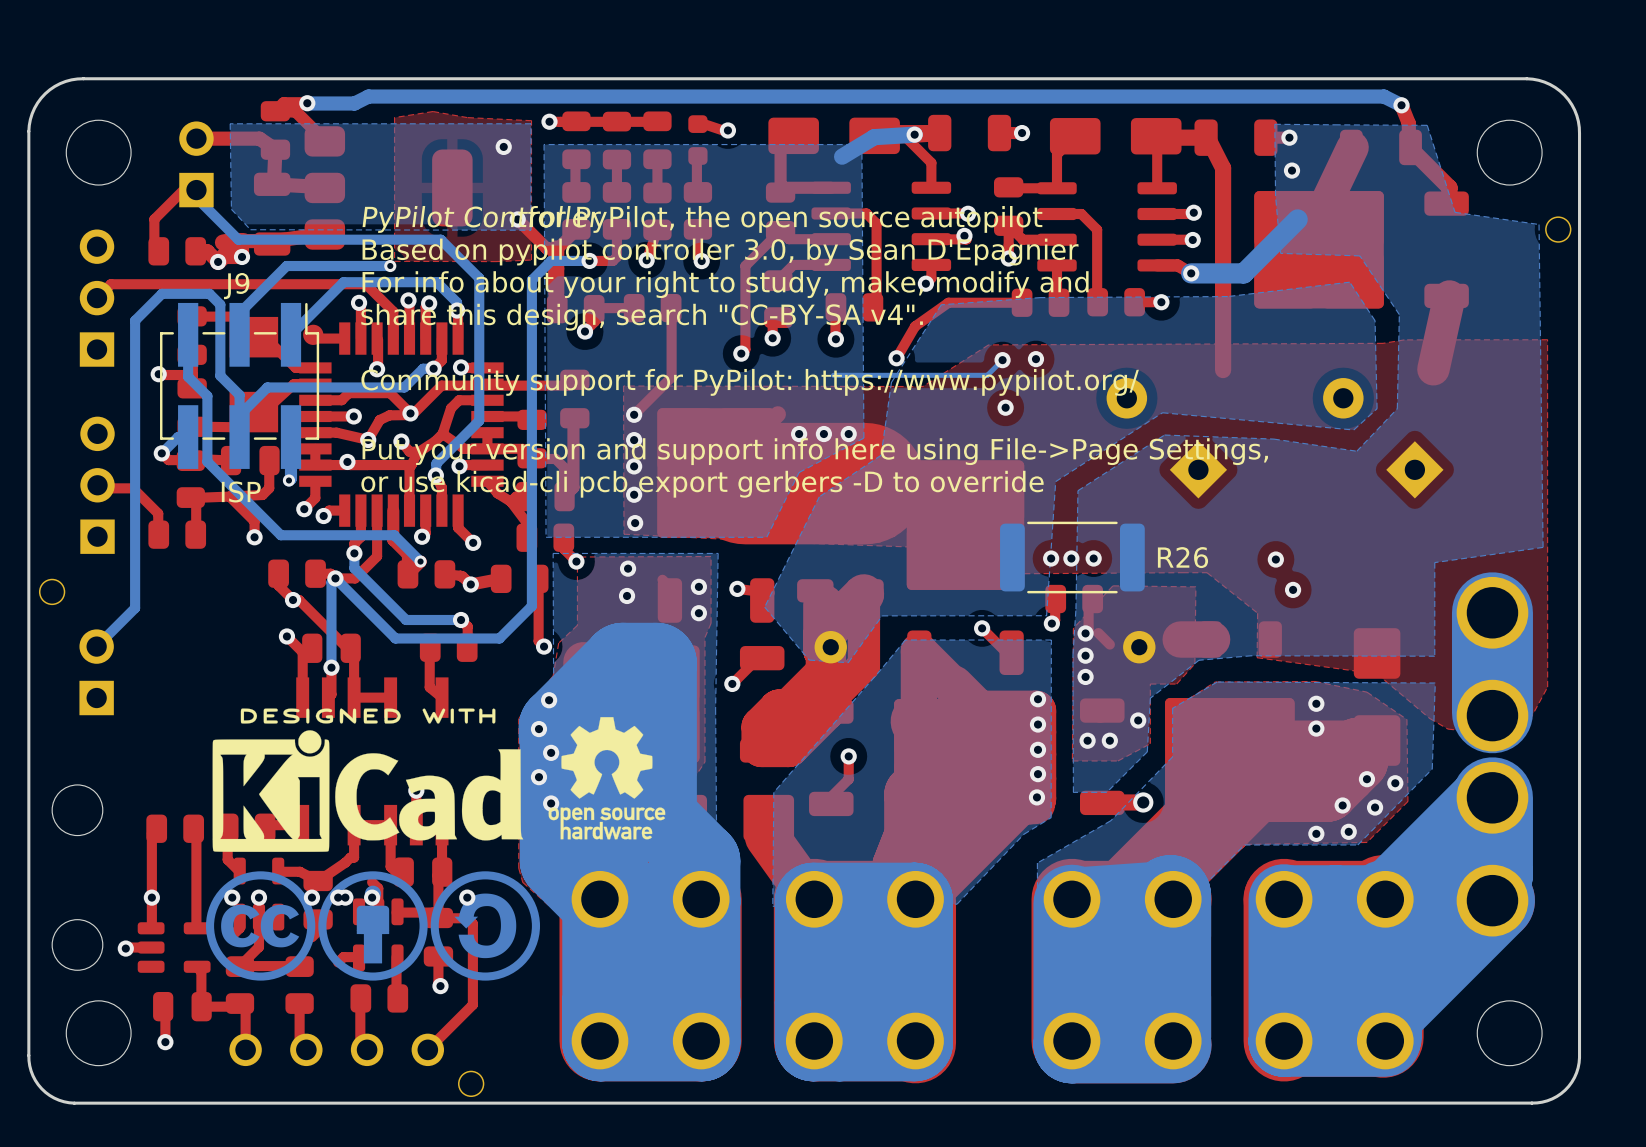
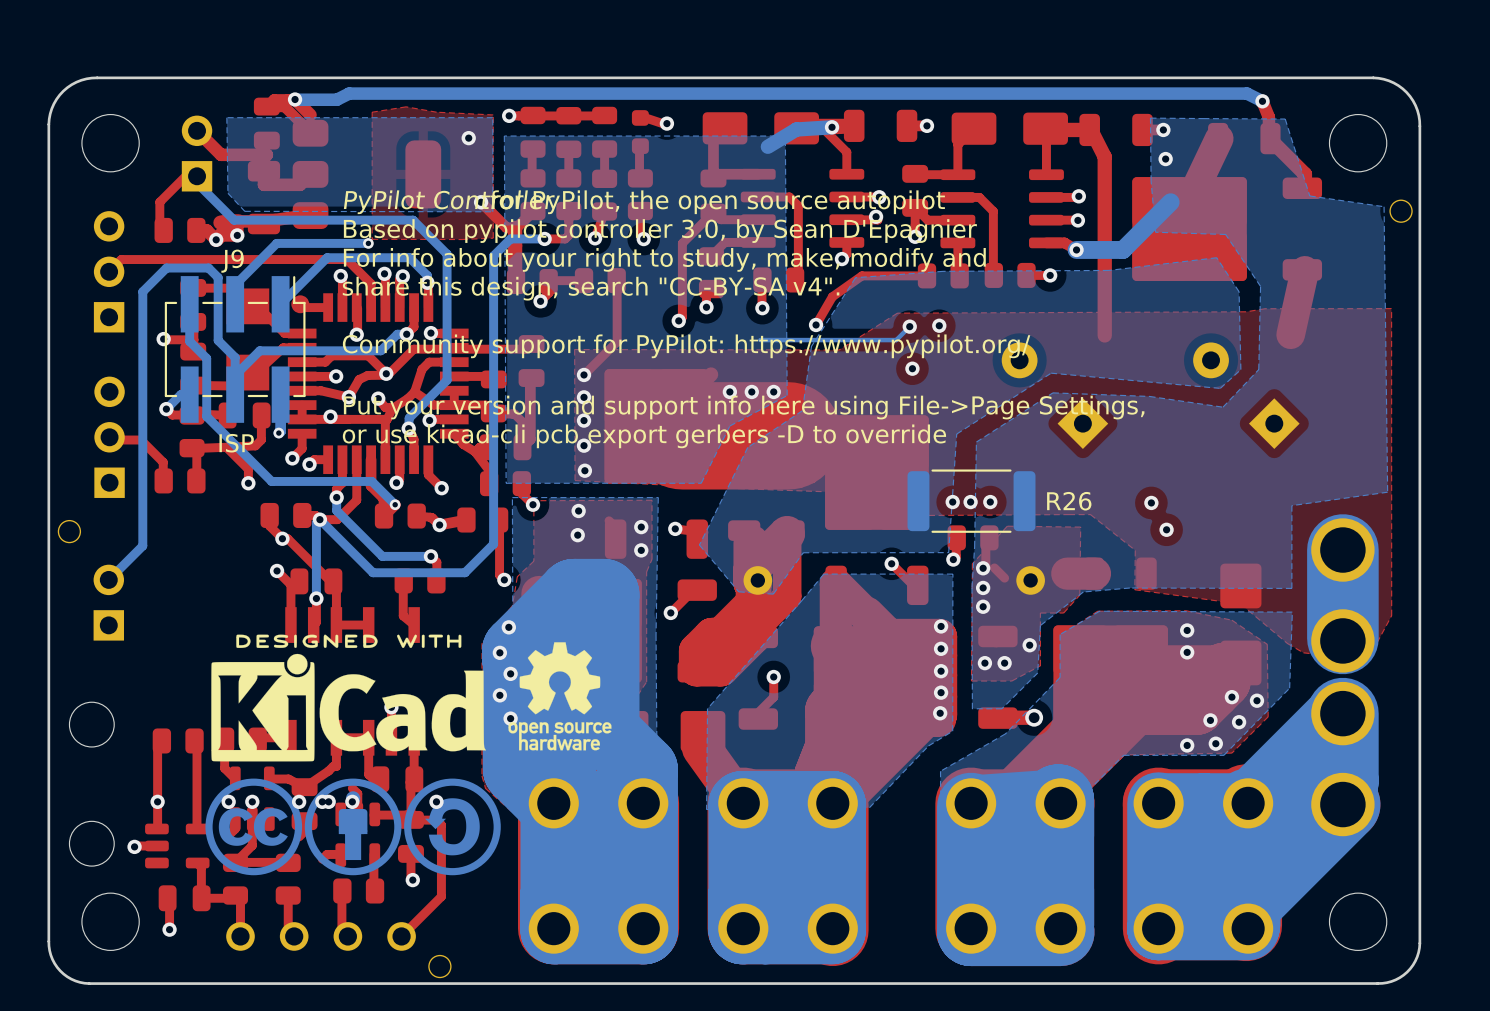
top track: none -> (295, 99) (310, 114)
top track: (196, 138) (259, 138) (275, 149) (273, 184) (324, 187) -> (197, 130) (221, 154) (266, 154) (263, 157) (263, 184) (300, 184) (310, 174)

